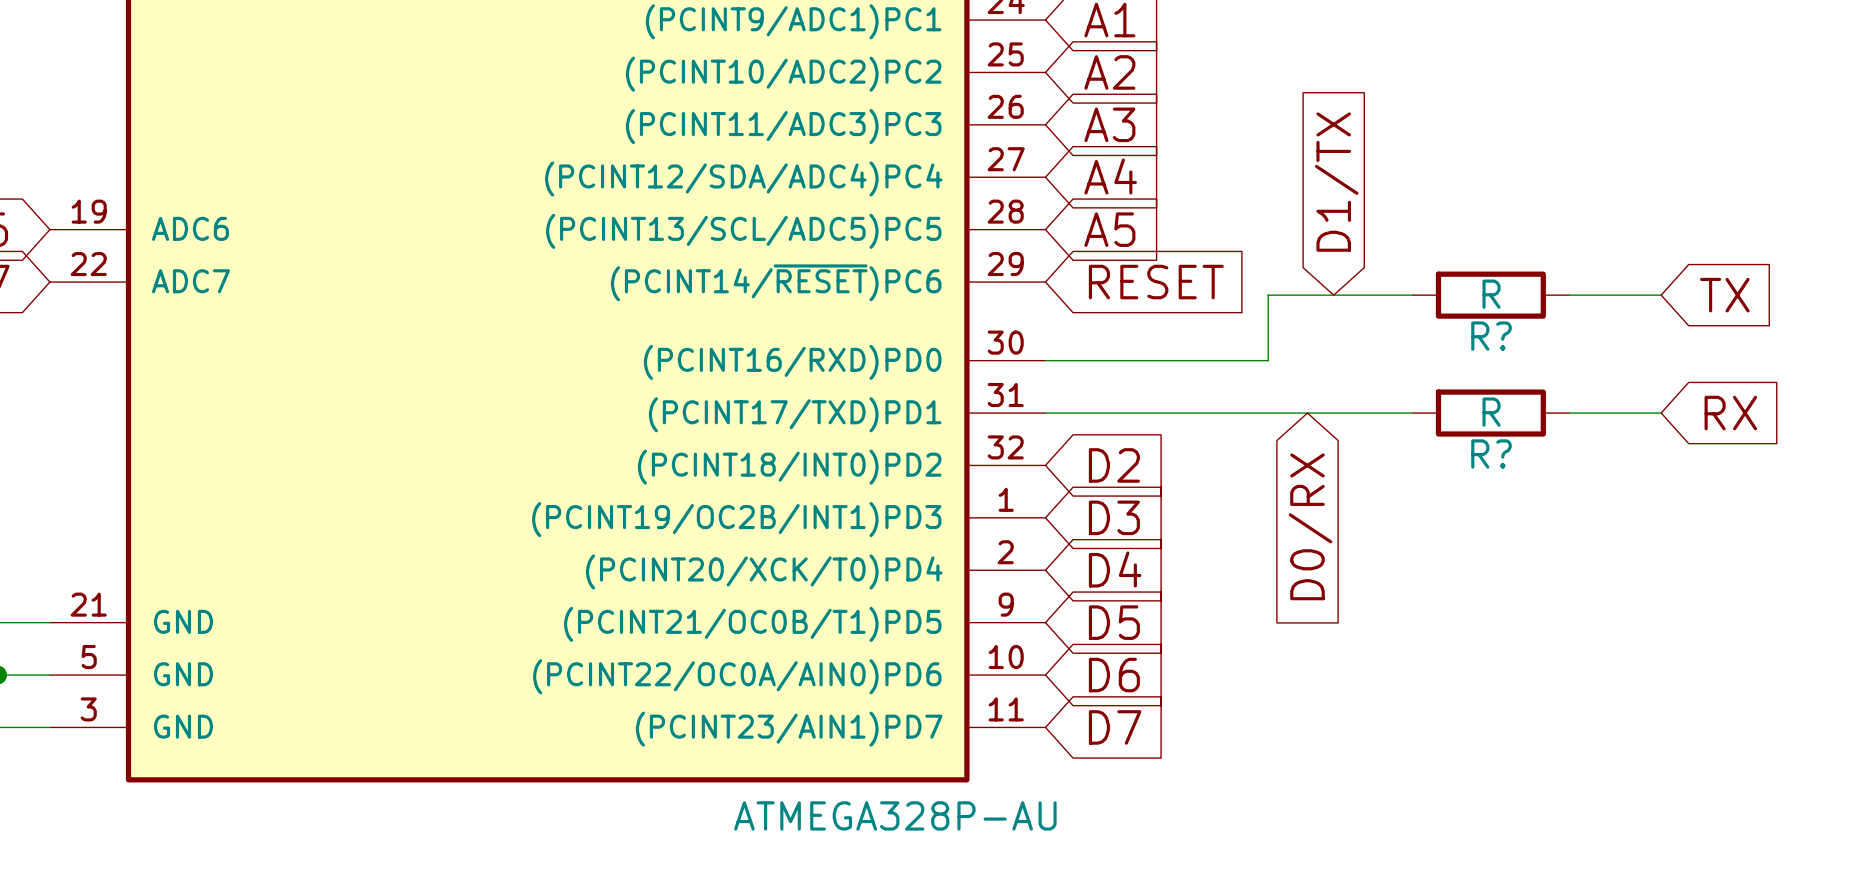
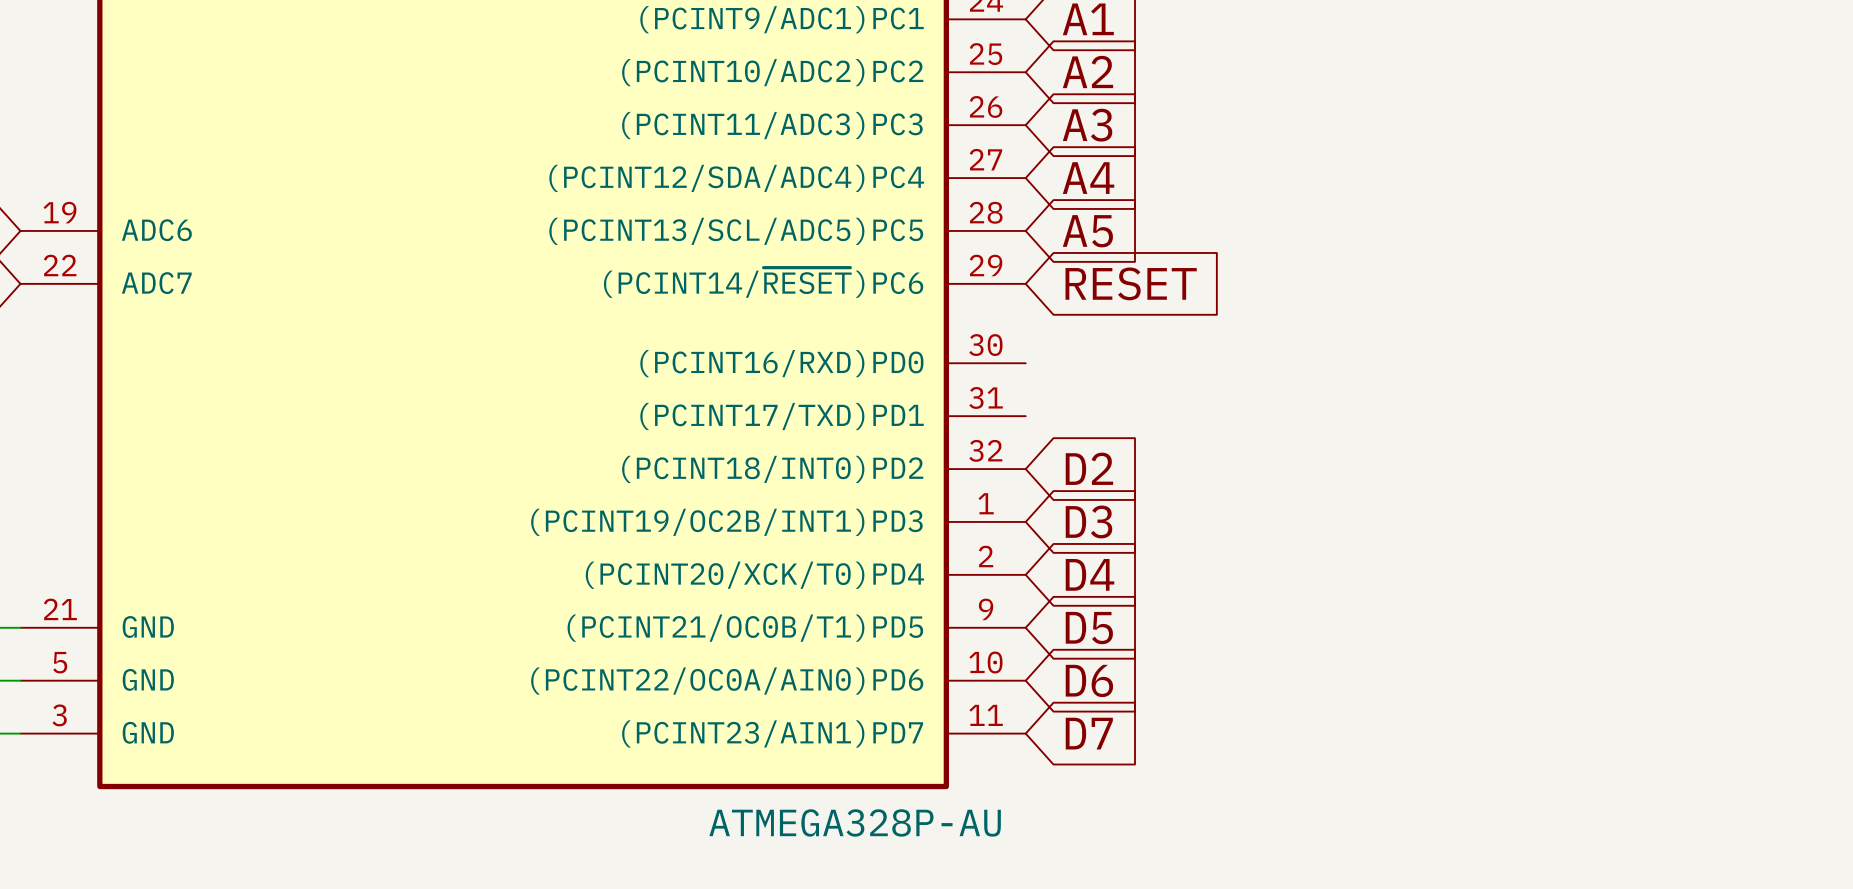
global label: D1/TX (1336, 182) -> none
wire: (1412, 295) (1268, 295) (1268, 360) (1045, 360) -> none
R?: R (1490, 295) -> none
wire: (1569, 295) (1661, 295) -> none
global label: TX (1724, 295) -> none
wire: (1045, 413) (1412, 413) -> none
R?: R (1490, 413) -> none
wire: (1569, 413) (1661, 413) -> none
global label: RX (1730, 413) -> none
global label: D0/RX (1310, 526) -> none

